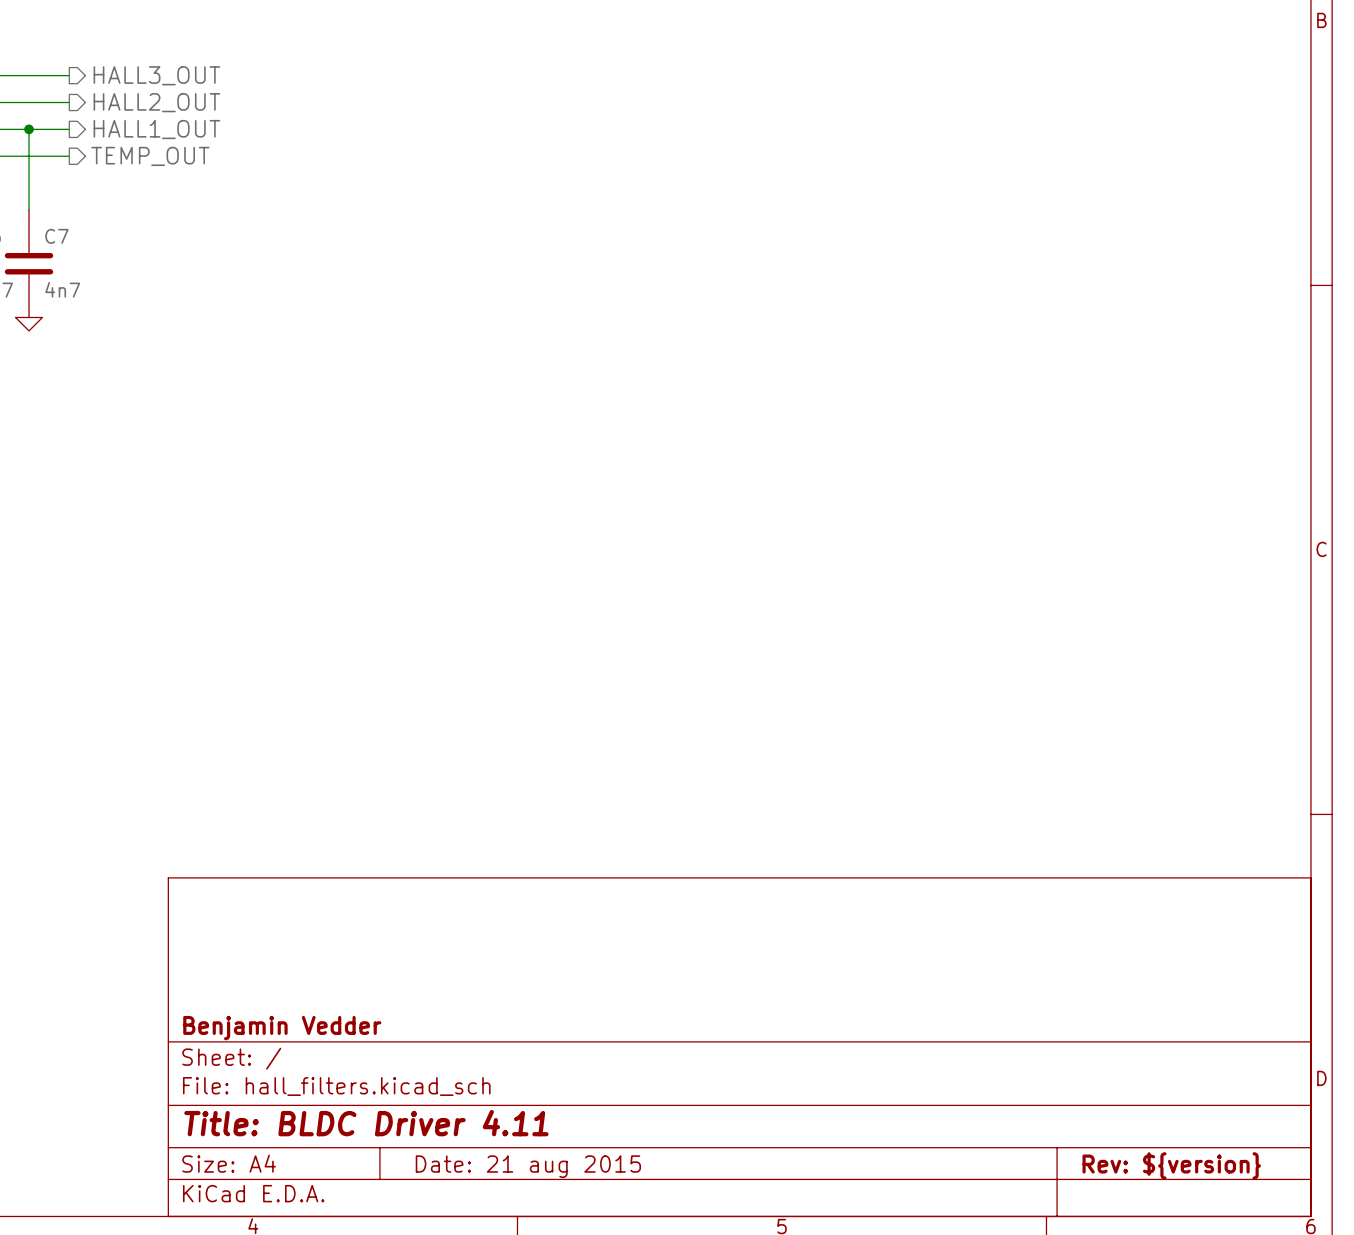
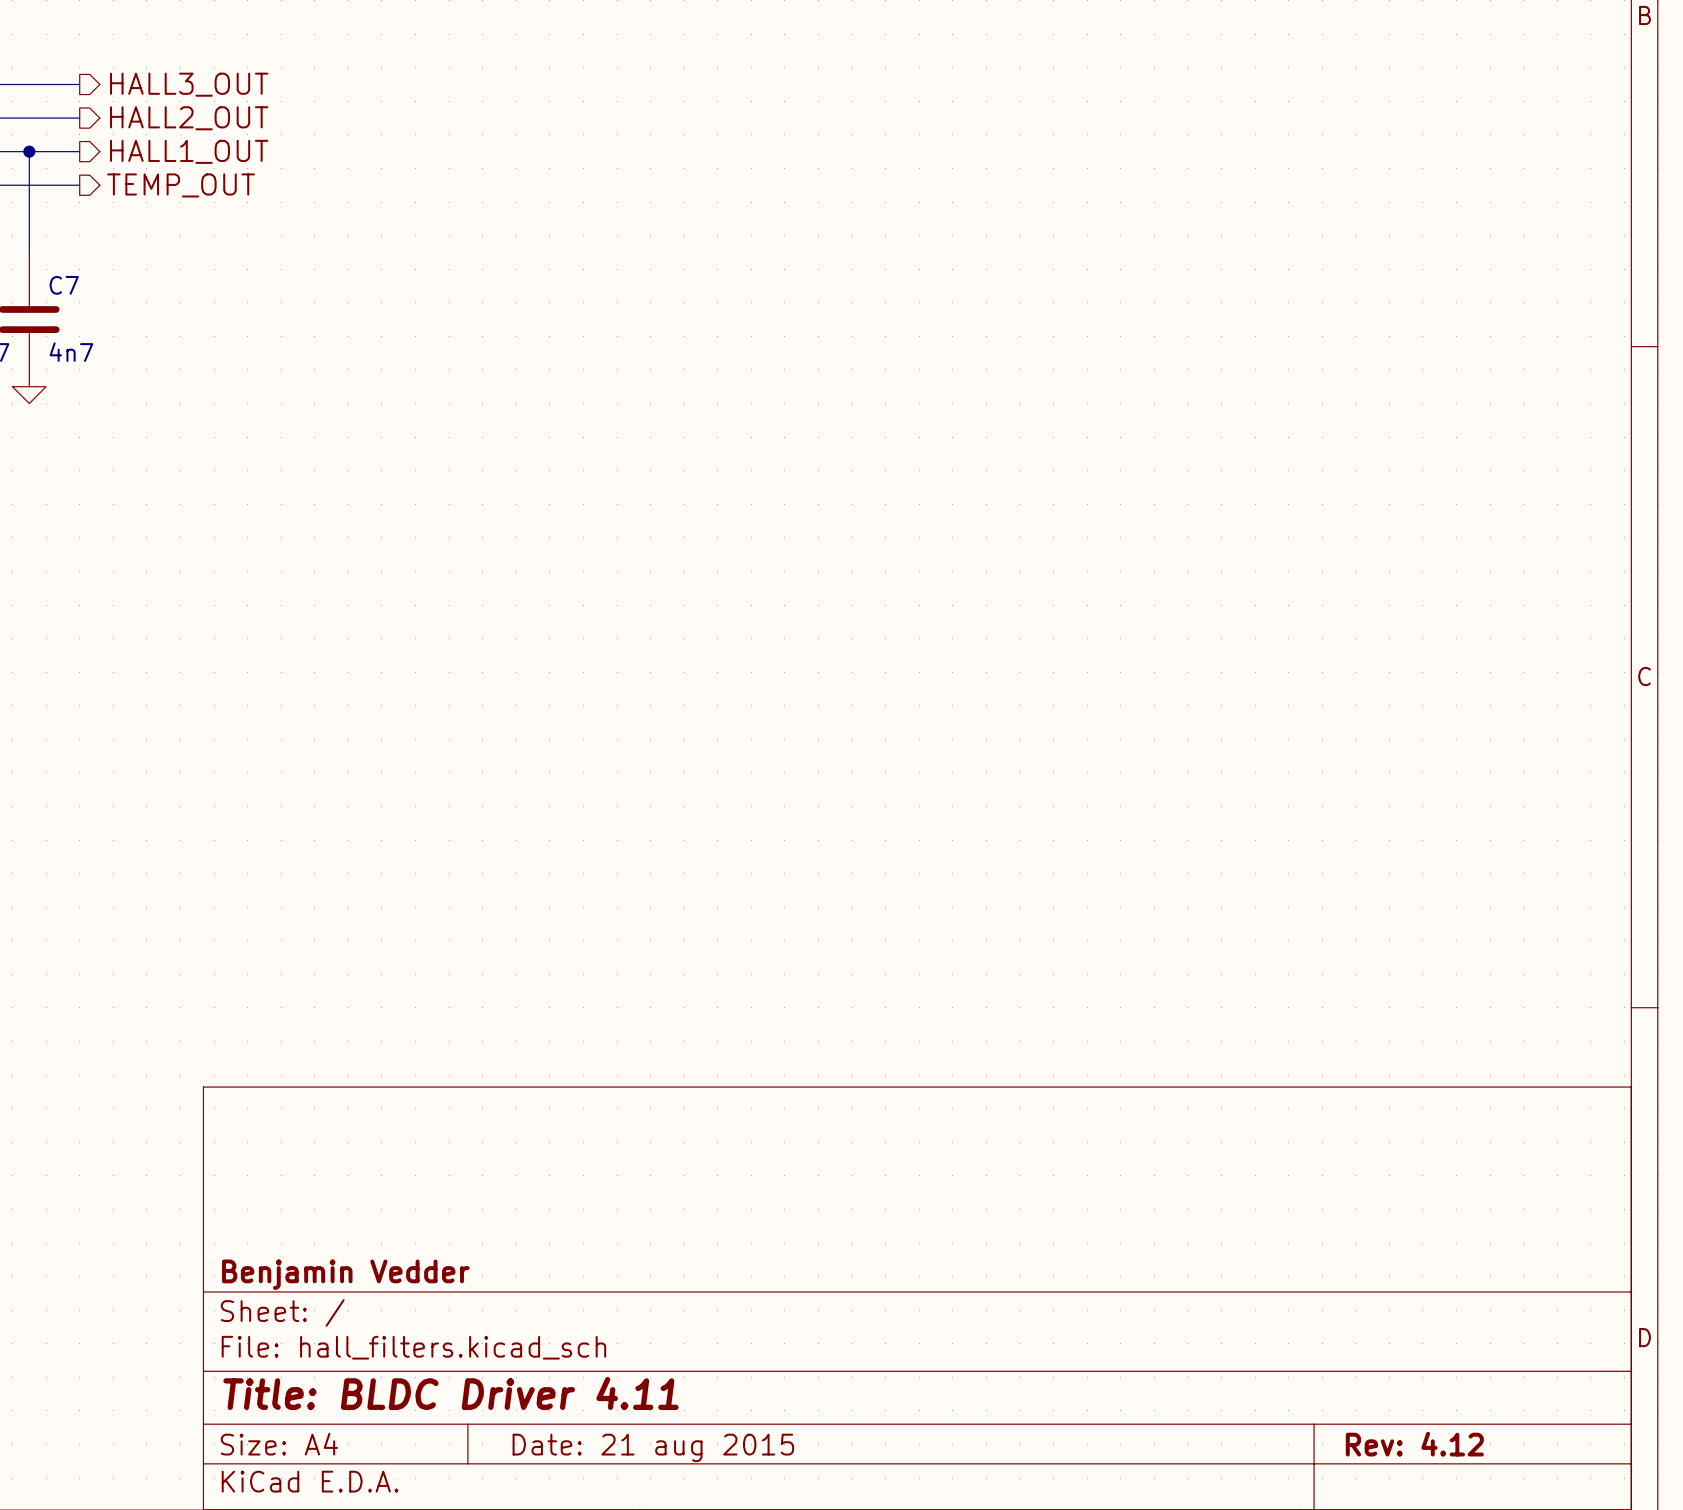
title block: Rev: ${version} (1171, 1165) -> Rev: 4.12 (1414, 1444)

